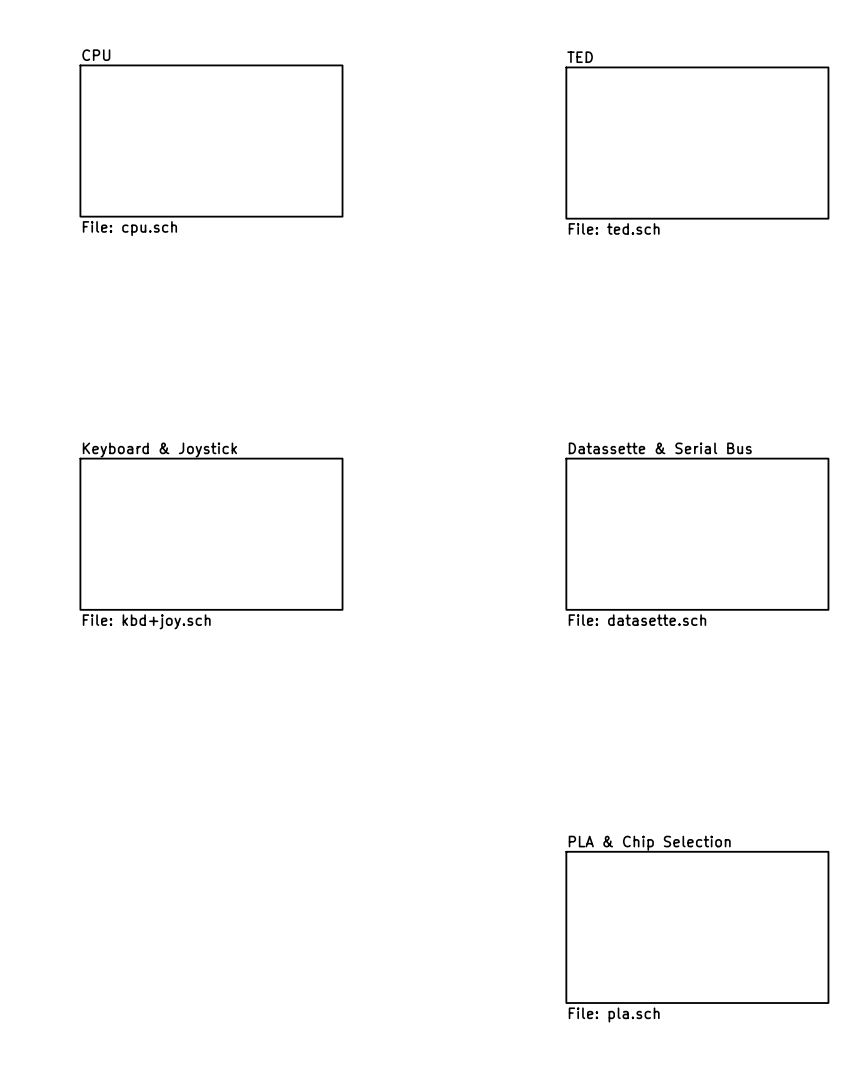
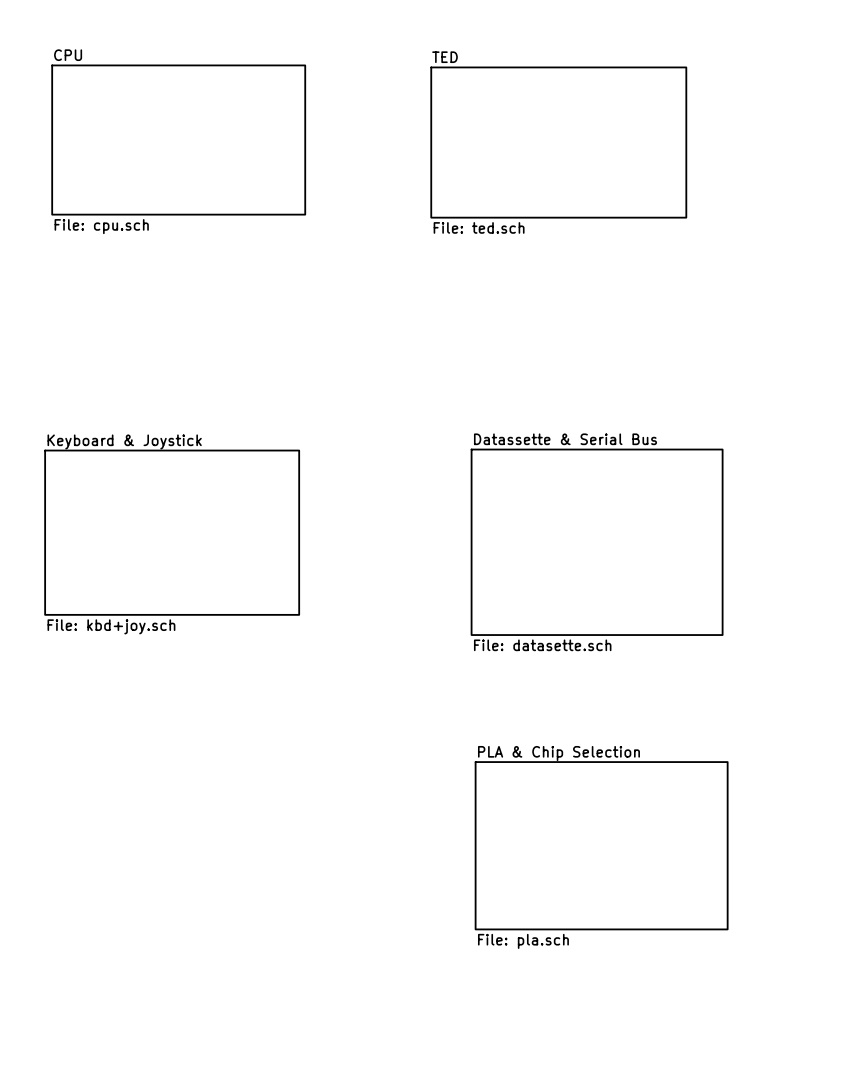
sheet CPU: none -> File: cpu.sch (178, 140)
sheet CPU: File: cpu.sch (211, 141) -> none
sheet TED: none -> File: ted.sch (558, 142)
sheet TED: File: ted.sch (697, 143) -> none
sheet Keyboard & Joystick: none -> File: kbd+joy.sch (172, 532)
sheet Keyboard & Joystick: File: kbd+joy.sch (211, 534) -> none
sheet Datassette & Serial Bus: File: datasette.sch (697, 534) -> none
sheet Datassette & Serial Bus: none -> File: datasette.sch (597, 542)
sheet PLA & Chip Selection: none -> File: pla.sch (601, 845)
sheet PLA & Chip Selection: File: pla.sch (697, 927) -> none

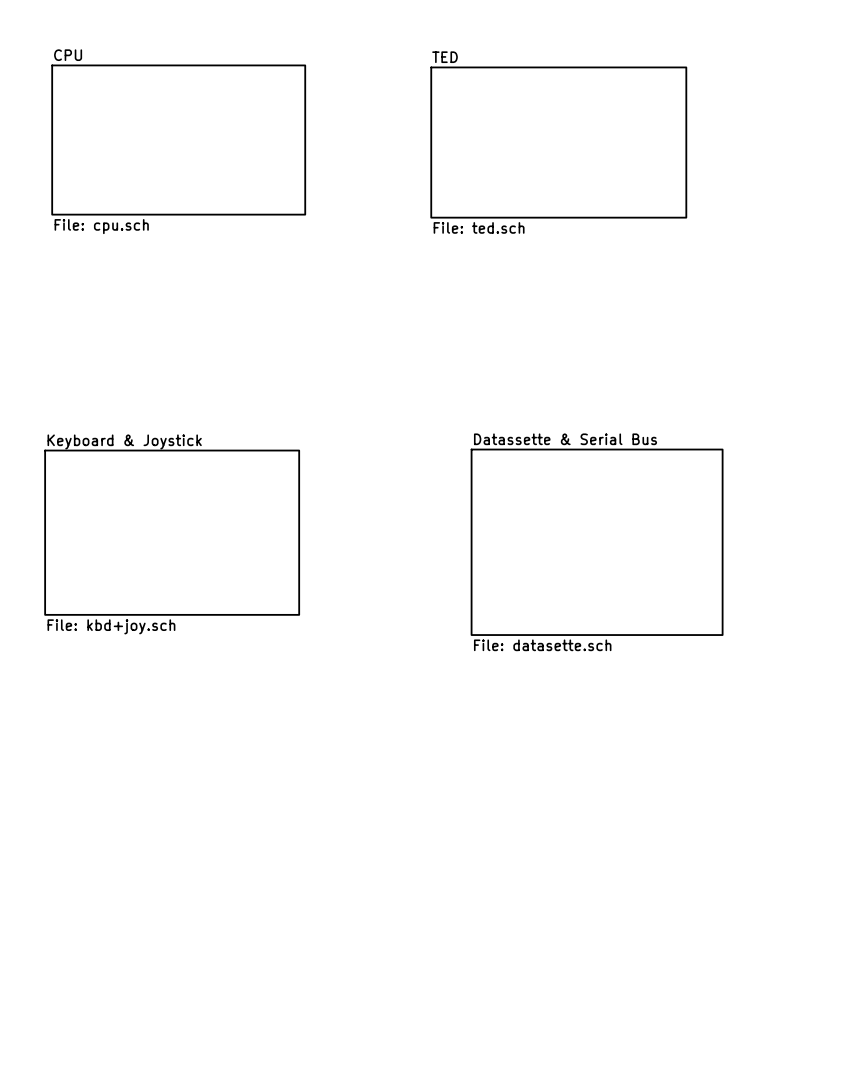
sheet PLA & Chip Selection: File: pla.sch (601, 845) -> none

